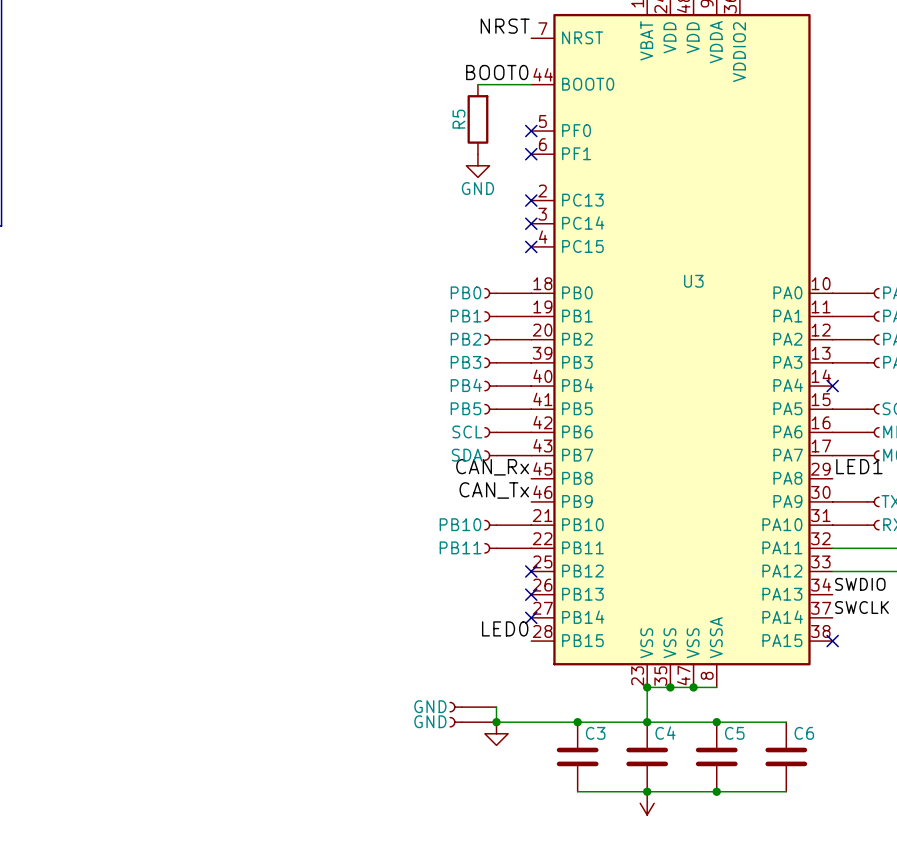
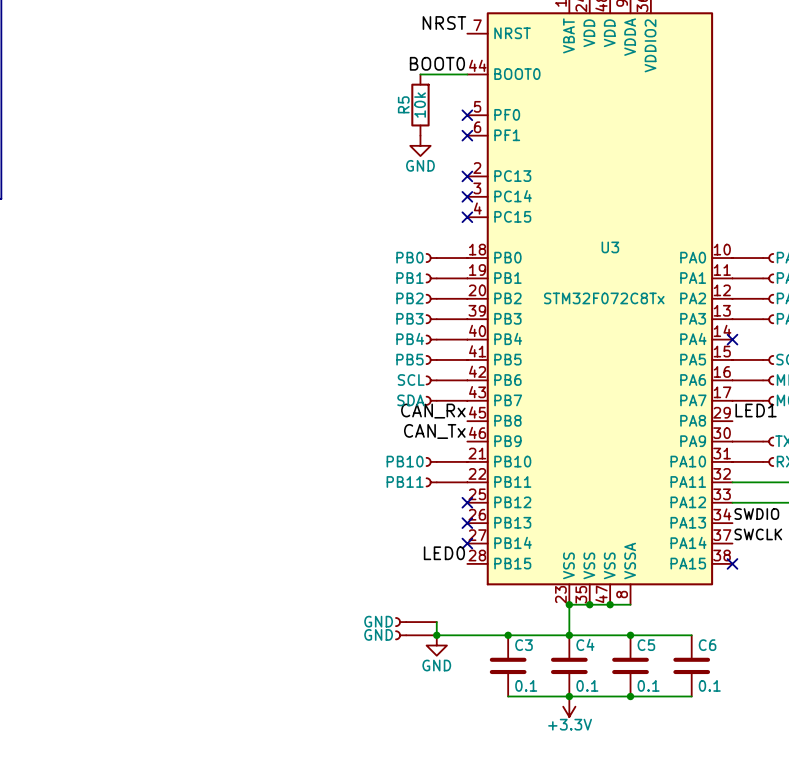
R5 value: none -> 10k (420, 105)
U3 value: none -> STM32F072C8Tx (604, 298)
power symbol text: none -> GND (436, 665)
C3 value: none -> 0.1 (526, 685)
C4 value: none -> 0.1 (587, 685)
C5 value: none -> 0.1 (648, 685)
C6 value: none -> 0.1 (709, 685)
power symbol text: none -> +3.3V (570, 724)

